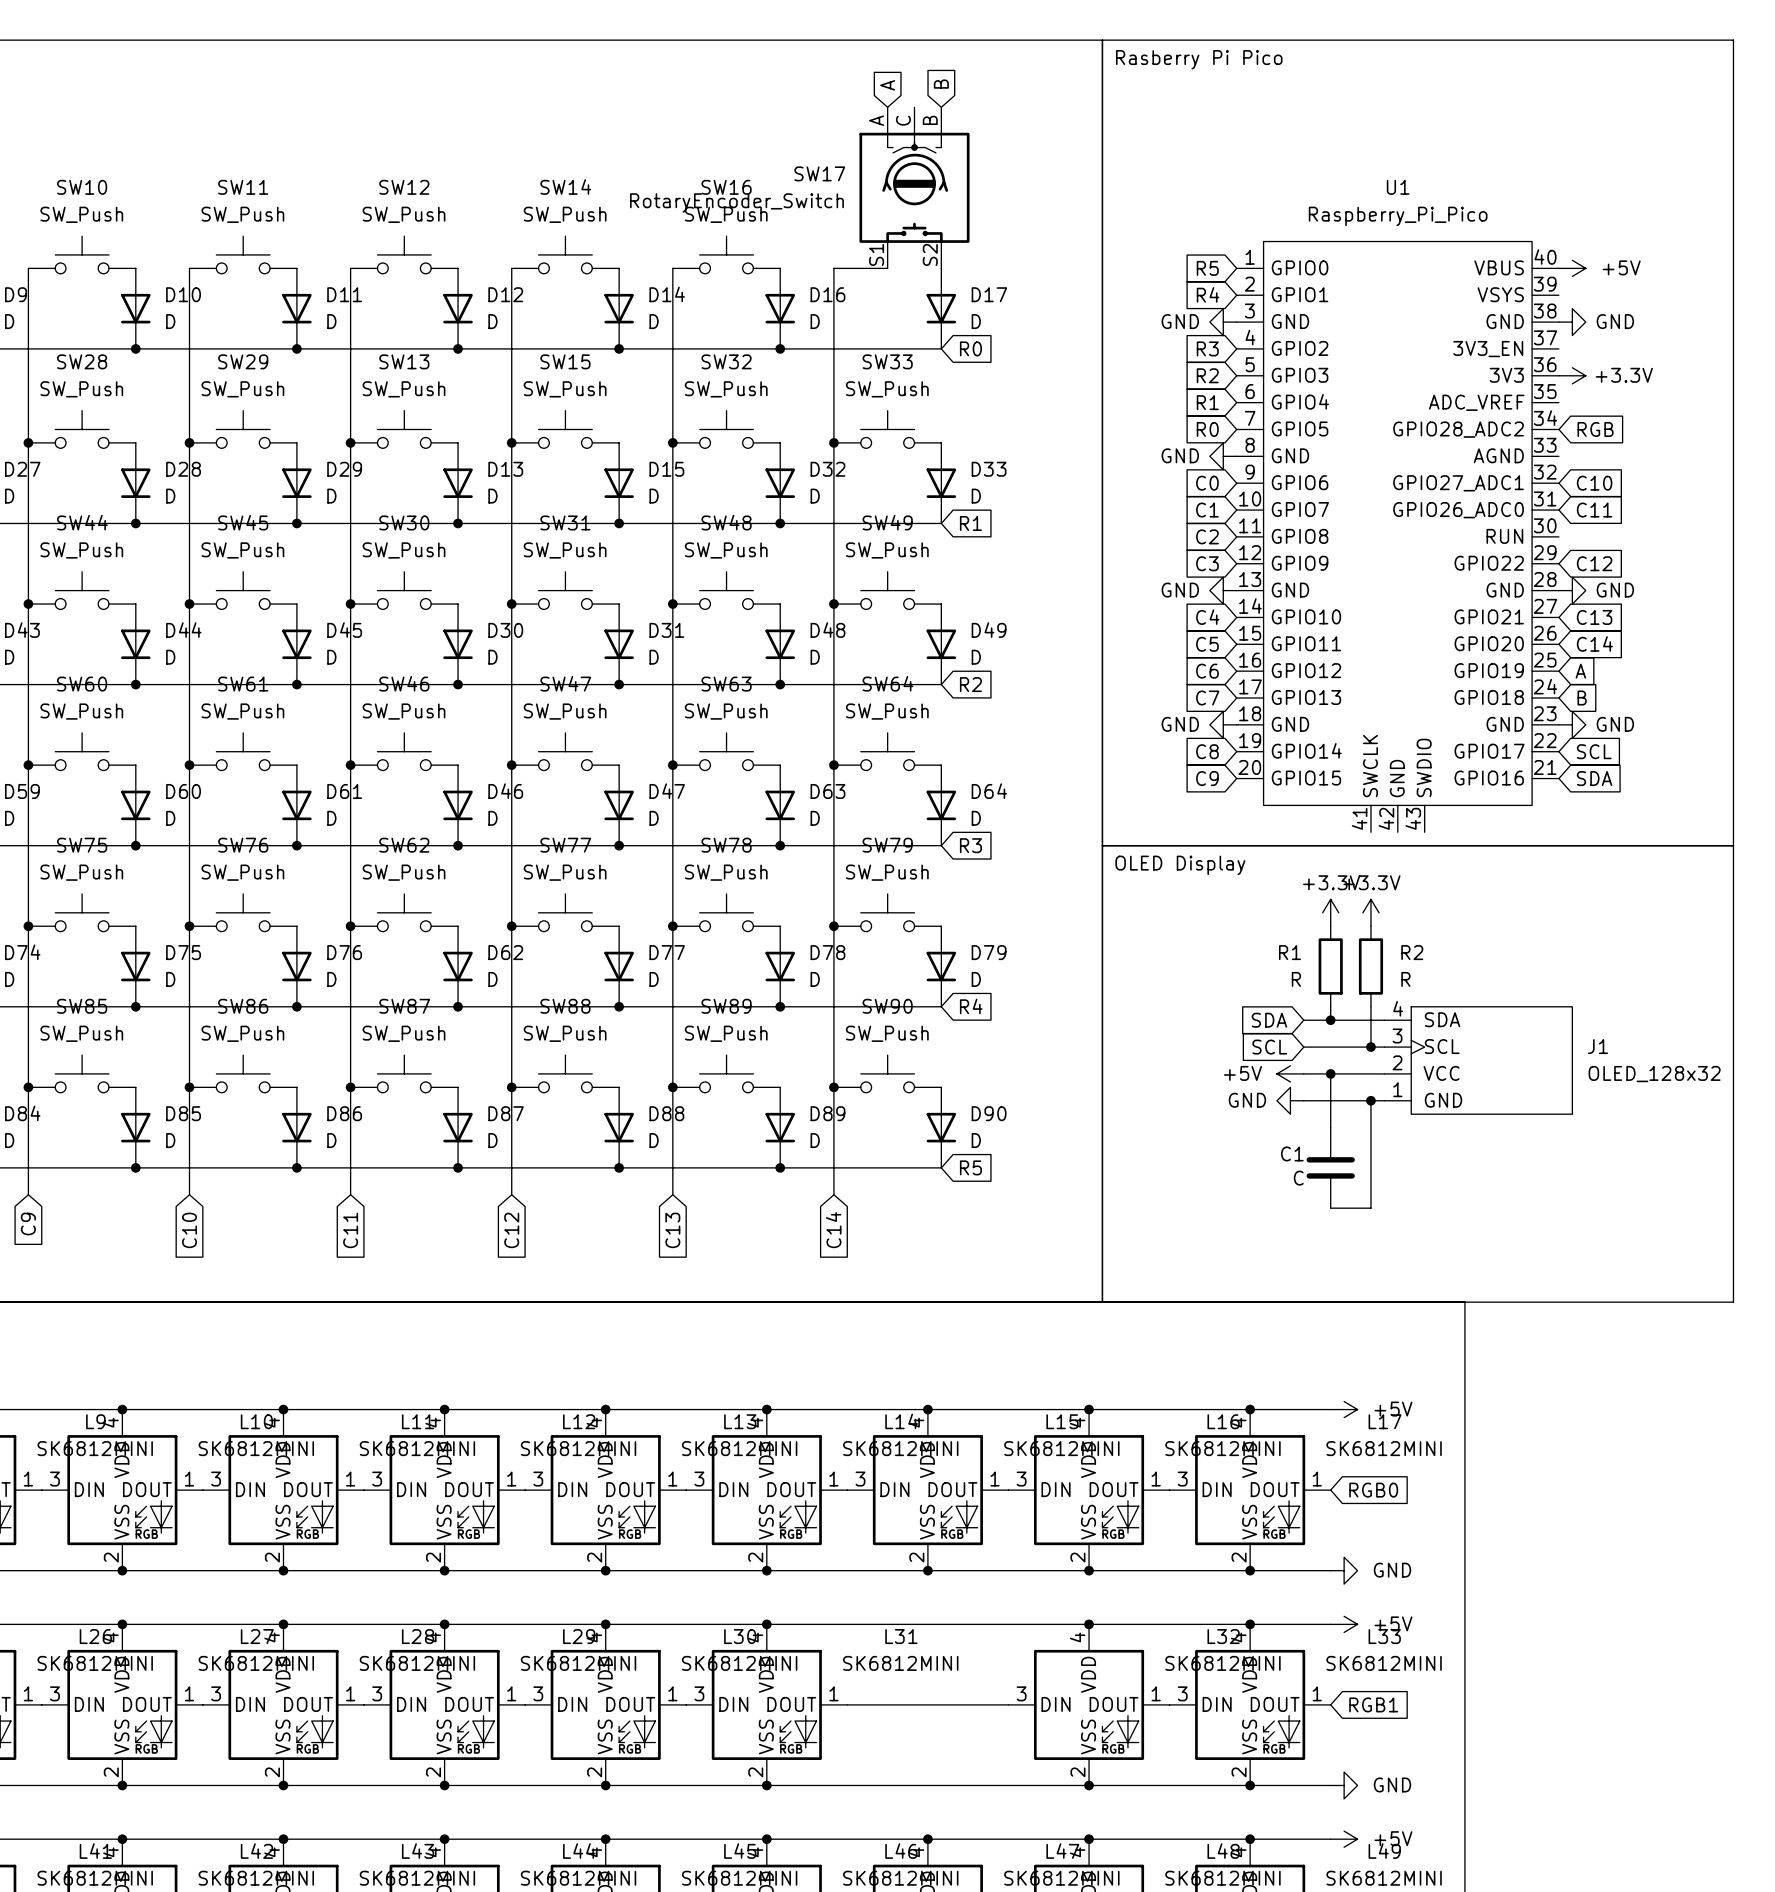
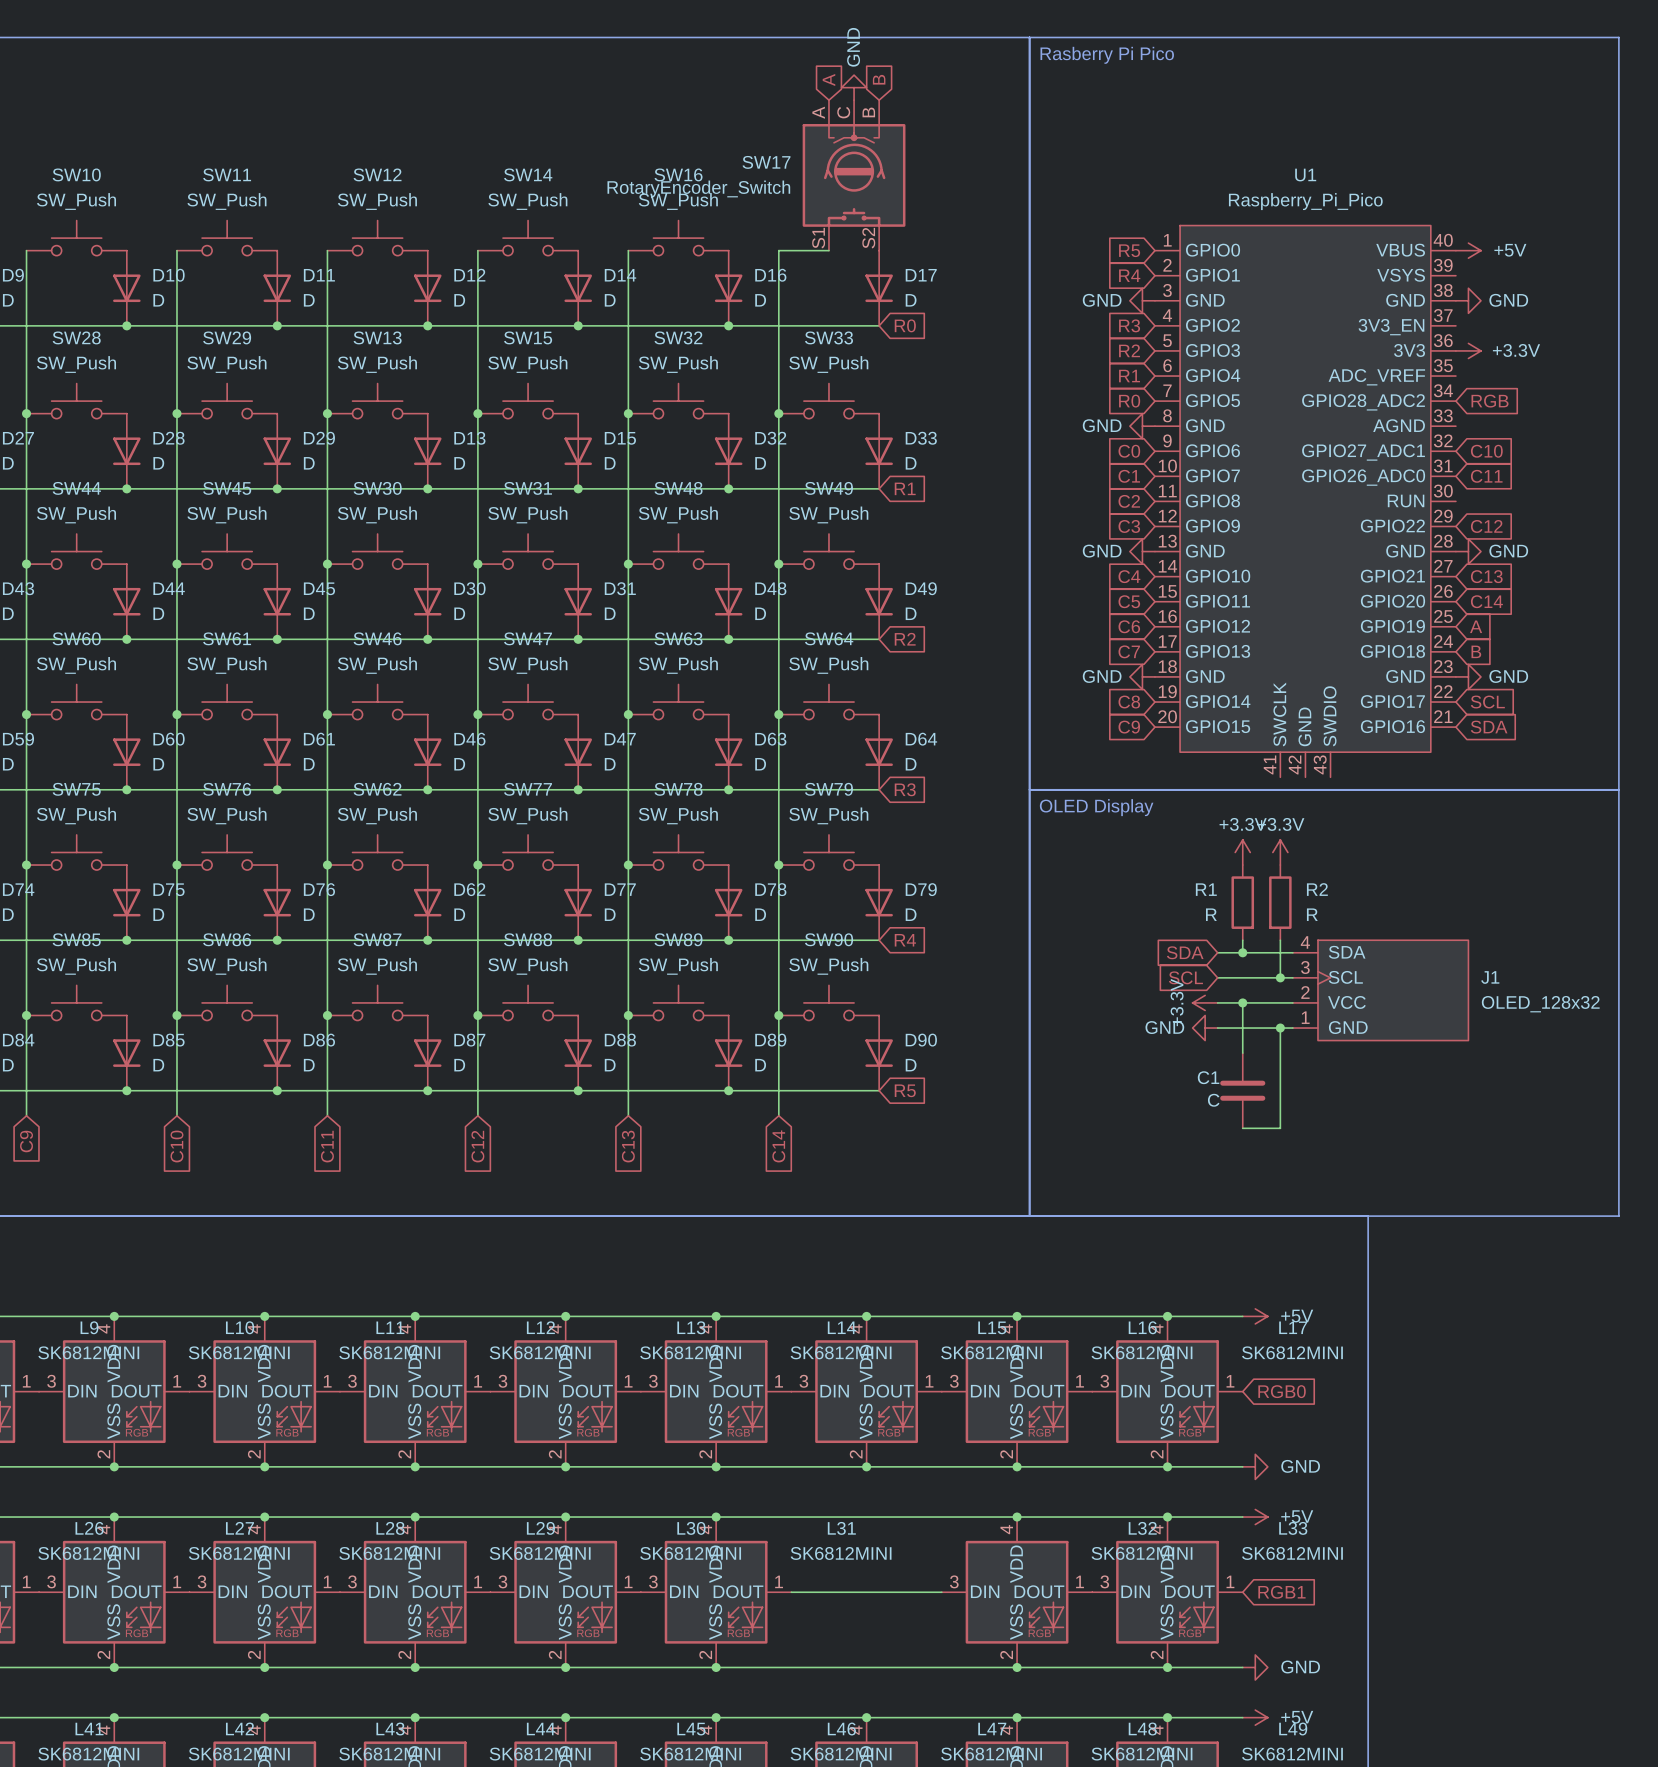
power symbol: none -> GND (854, 87)
power symbol: +5V (1290, 1073) -> +3.3V (1205, 1002)

